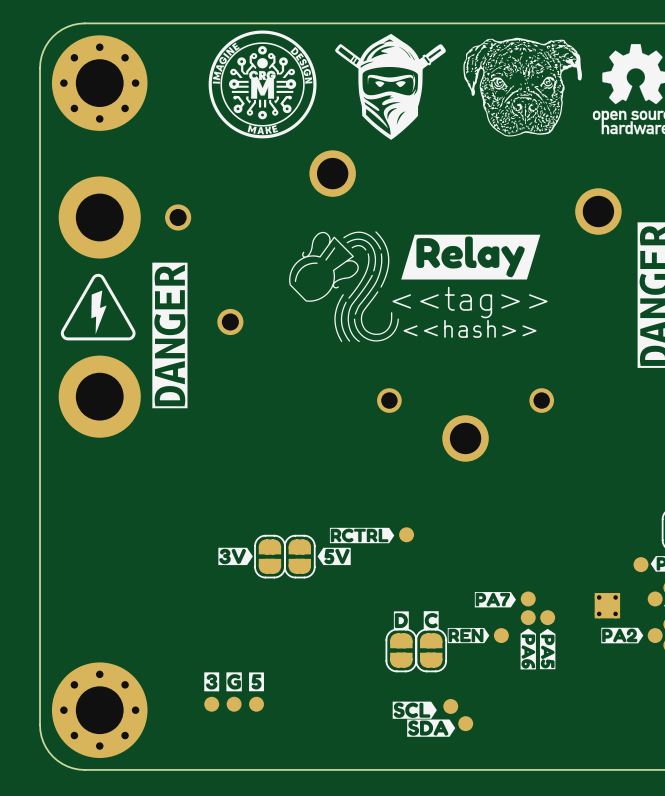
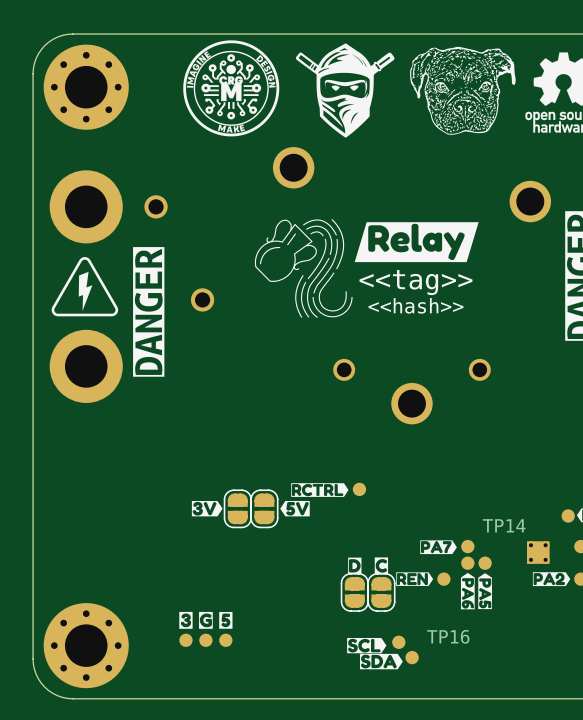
TP14 name: none -> TP14 (504, 525)
TP16 name: none -> TP16 (448, 636)

